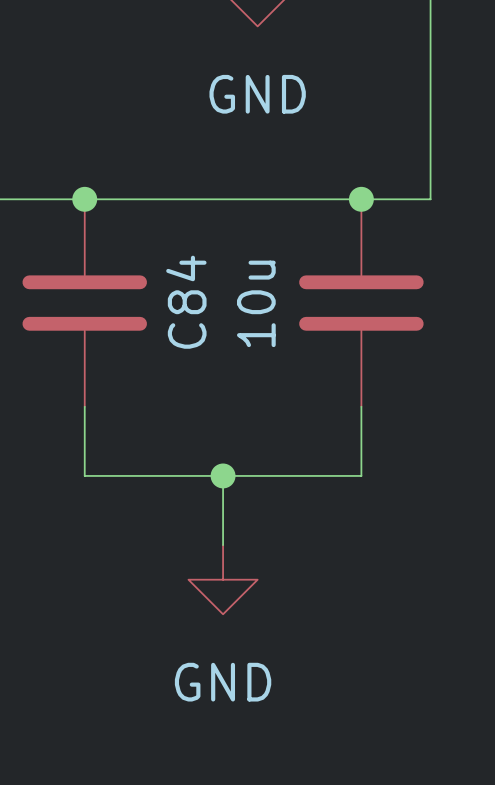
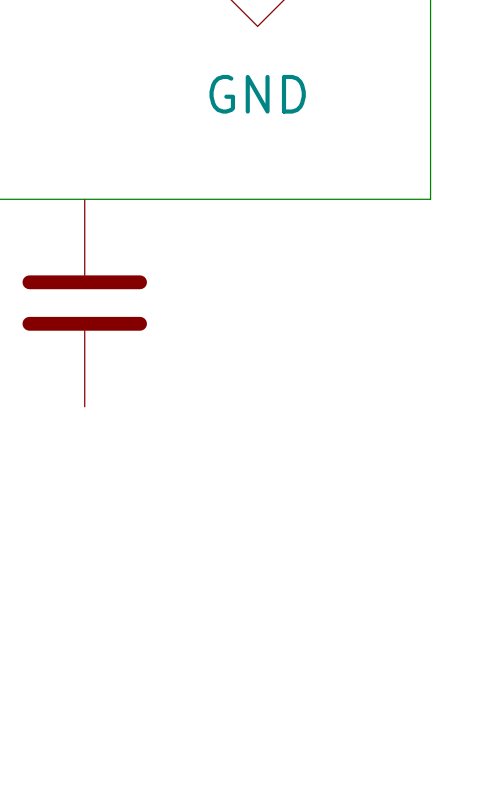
junction: (84, 199) -> none
junction: (361, 199) -> none
C84: 10u (361, 303) -> none
wire: (84, 406) (84, 475) (361, 475) (361, 406) -> none
wire: (223, 475) (223, 545) -> none
junction: (223, 475) -> none
power symbol: GND (223, 579) -> none

